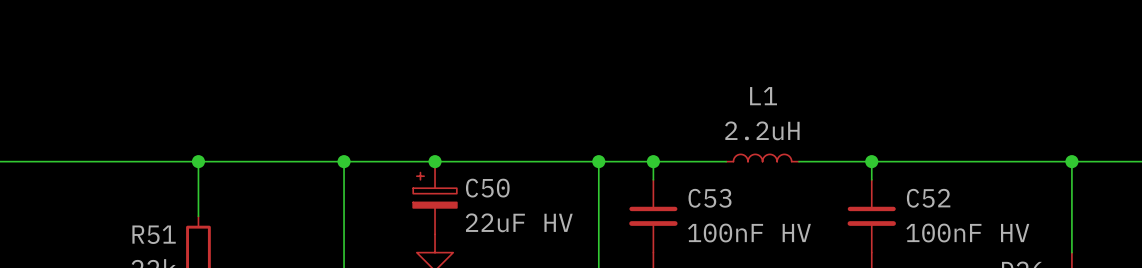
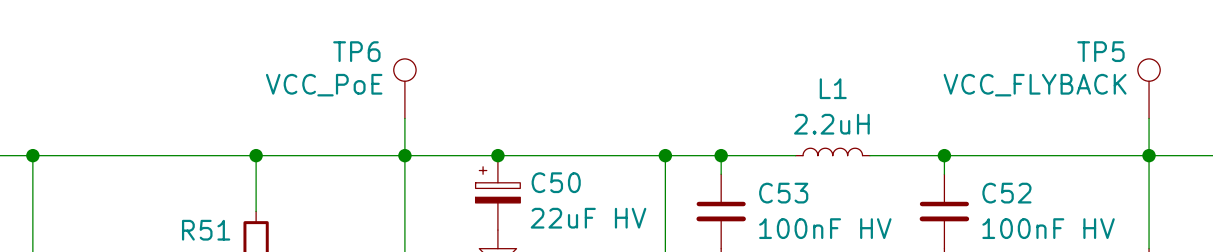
TP6: none -> VCC_PoE (404, 88)
TP5: none -> VCC_FLYBACK (1149, 88)
wire: none -> (404, 118) (404, 155)
wire: none -> (1149, 118) (1149, 155)

